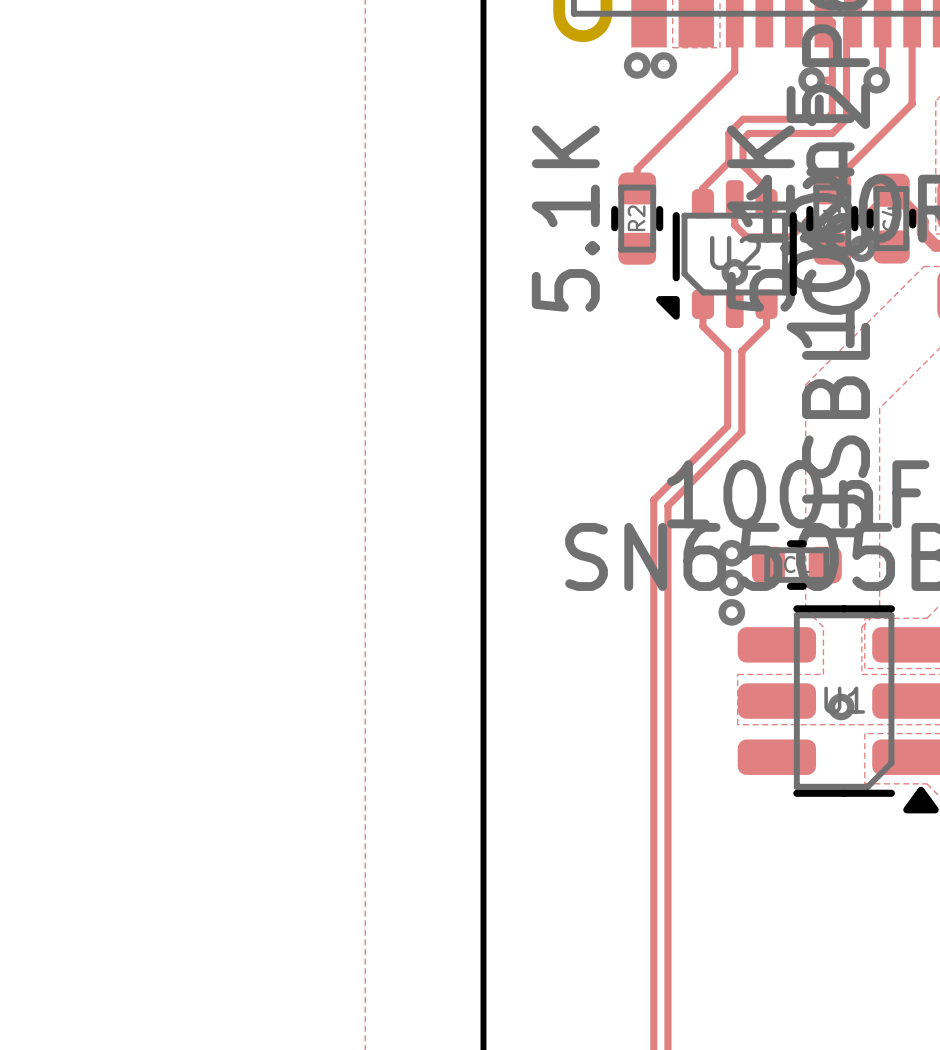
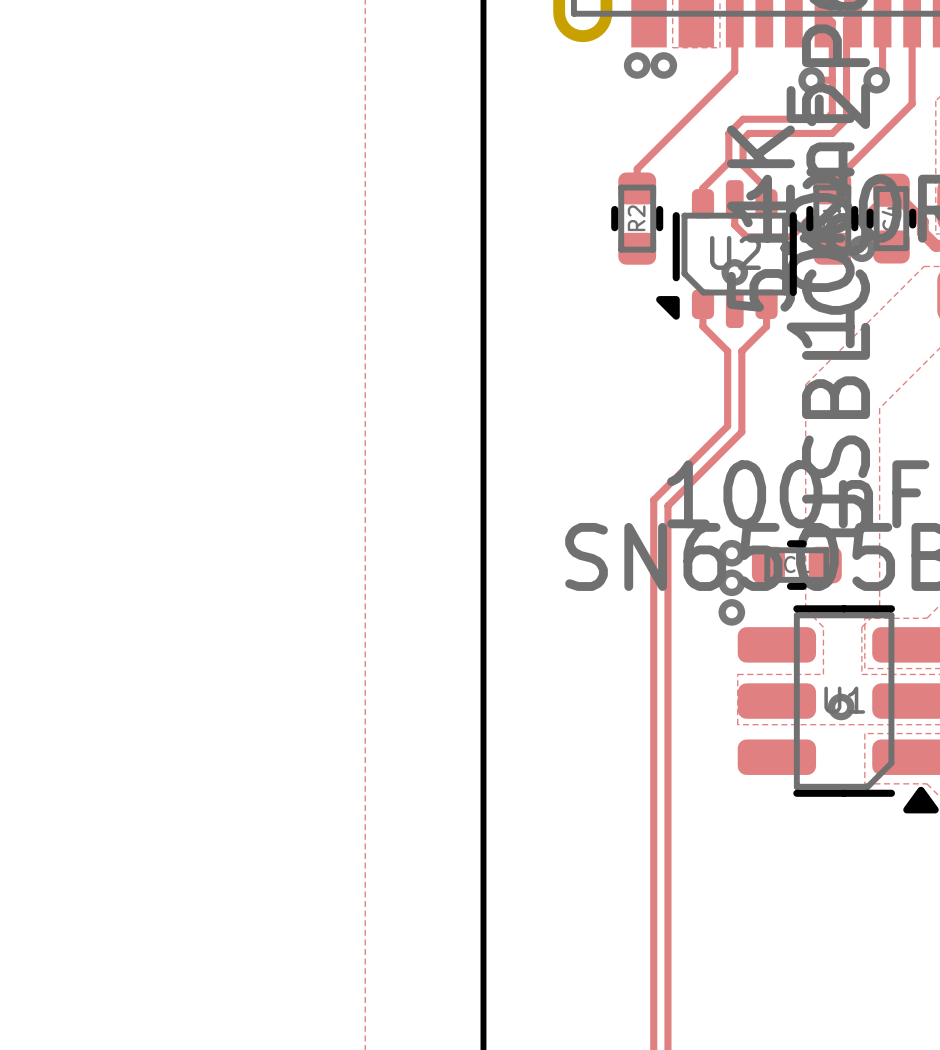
R2 value: 5.1K (565, 218) -> none

